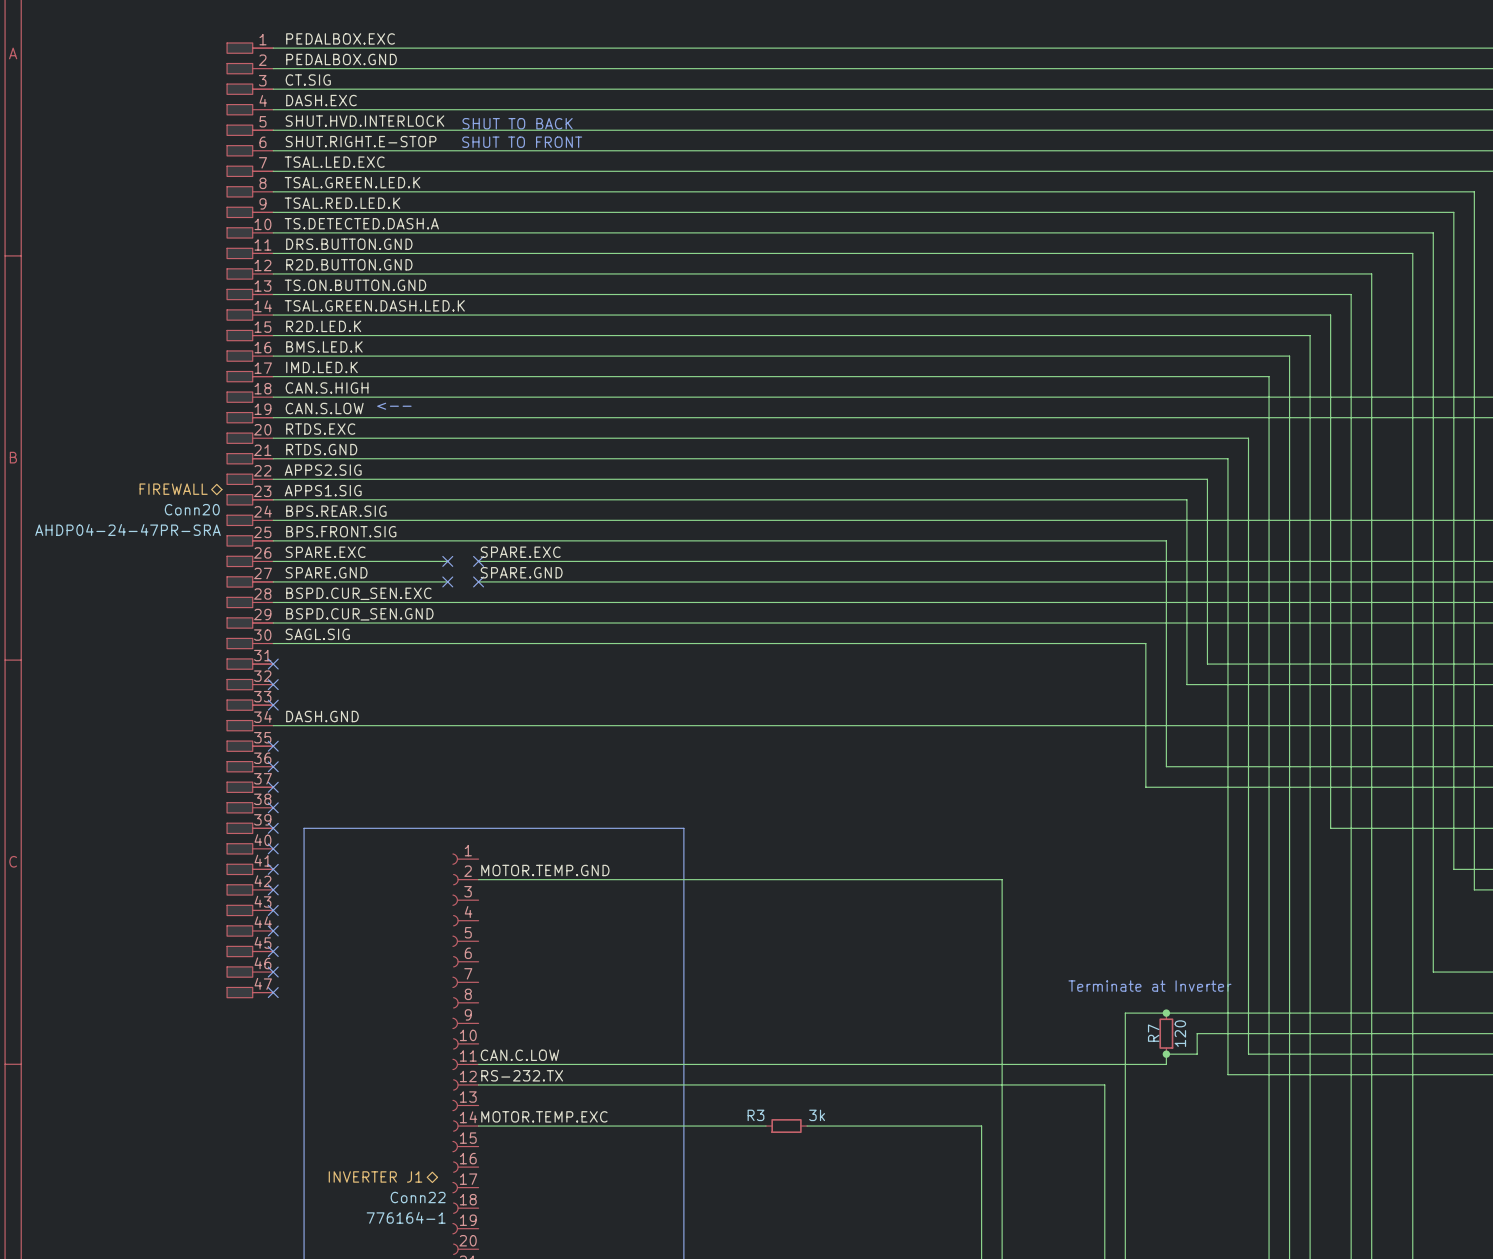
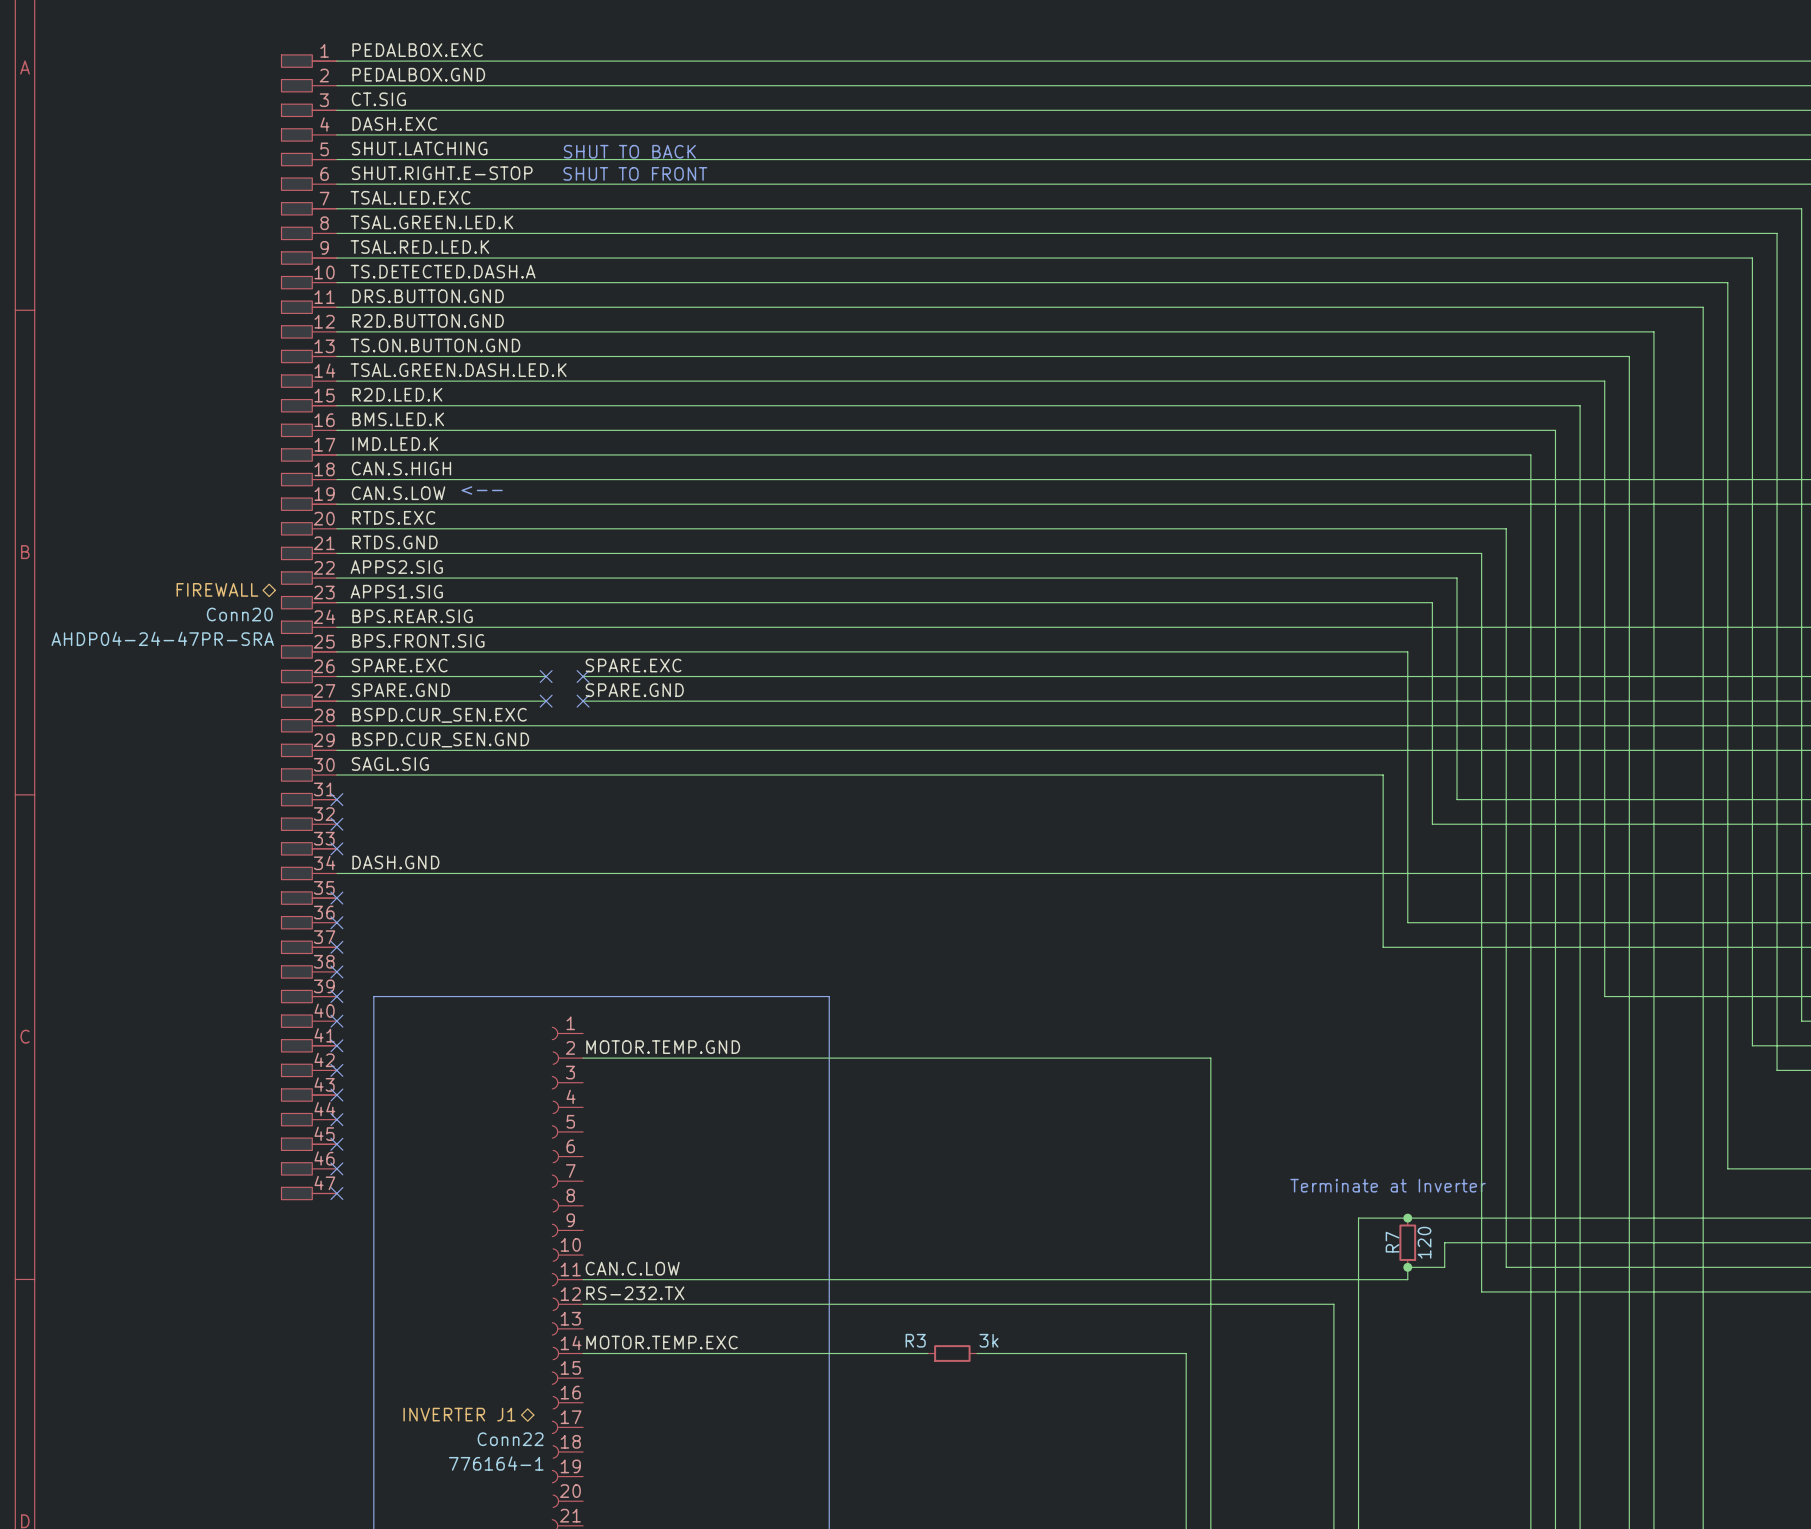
label: SHUT.HVD.INTERLOCK (364, 121) -> SHUT.LATCHING (419, 148)

